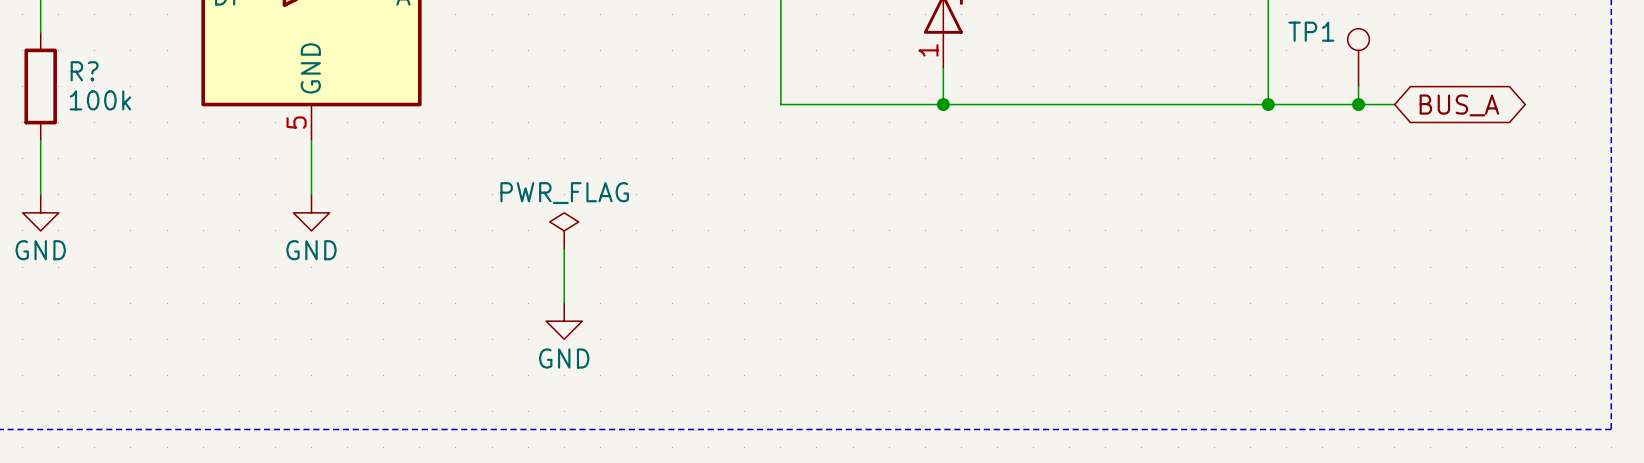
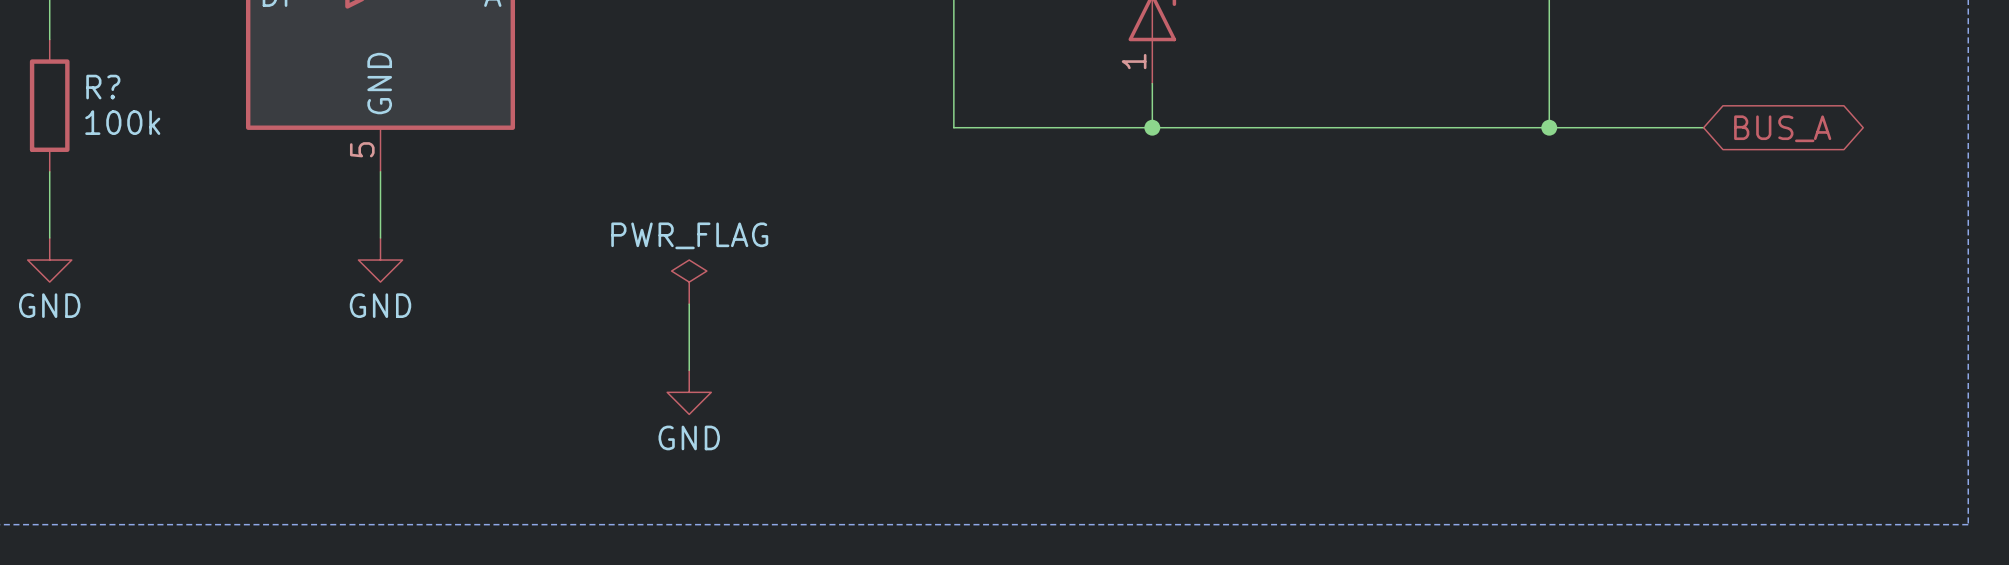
TP1: (1358, 57) -> none
wire: (1358, 86) (1358, 104) -> none
junction: (1358, 104) -> none

